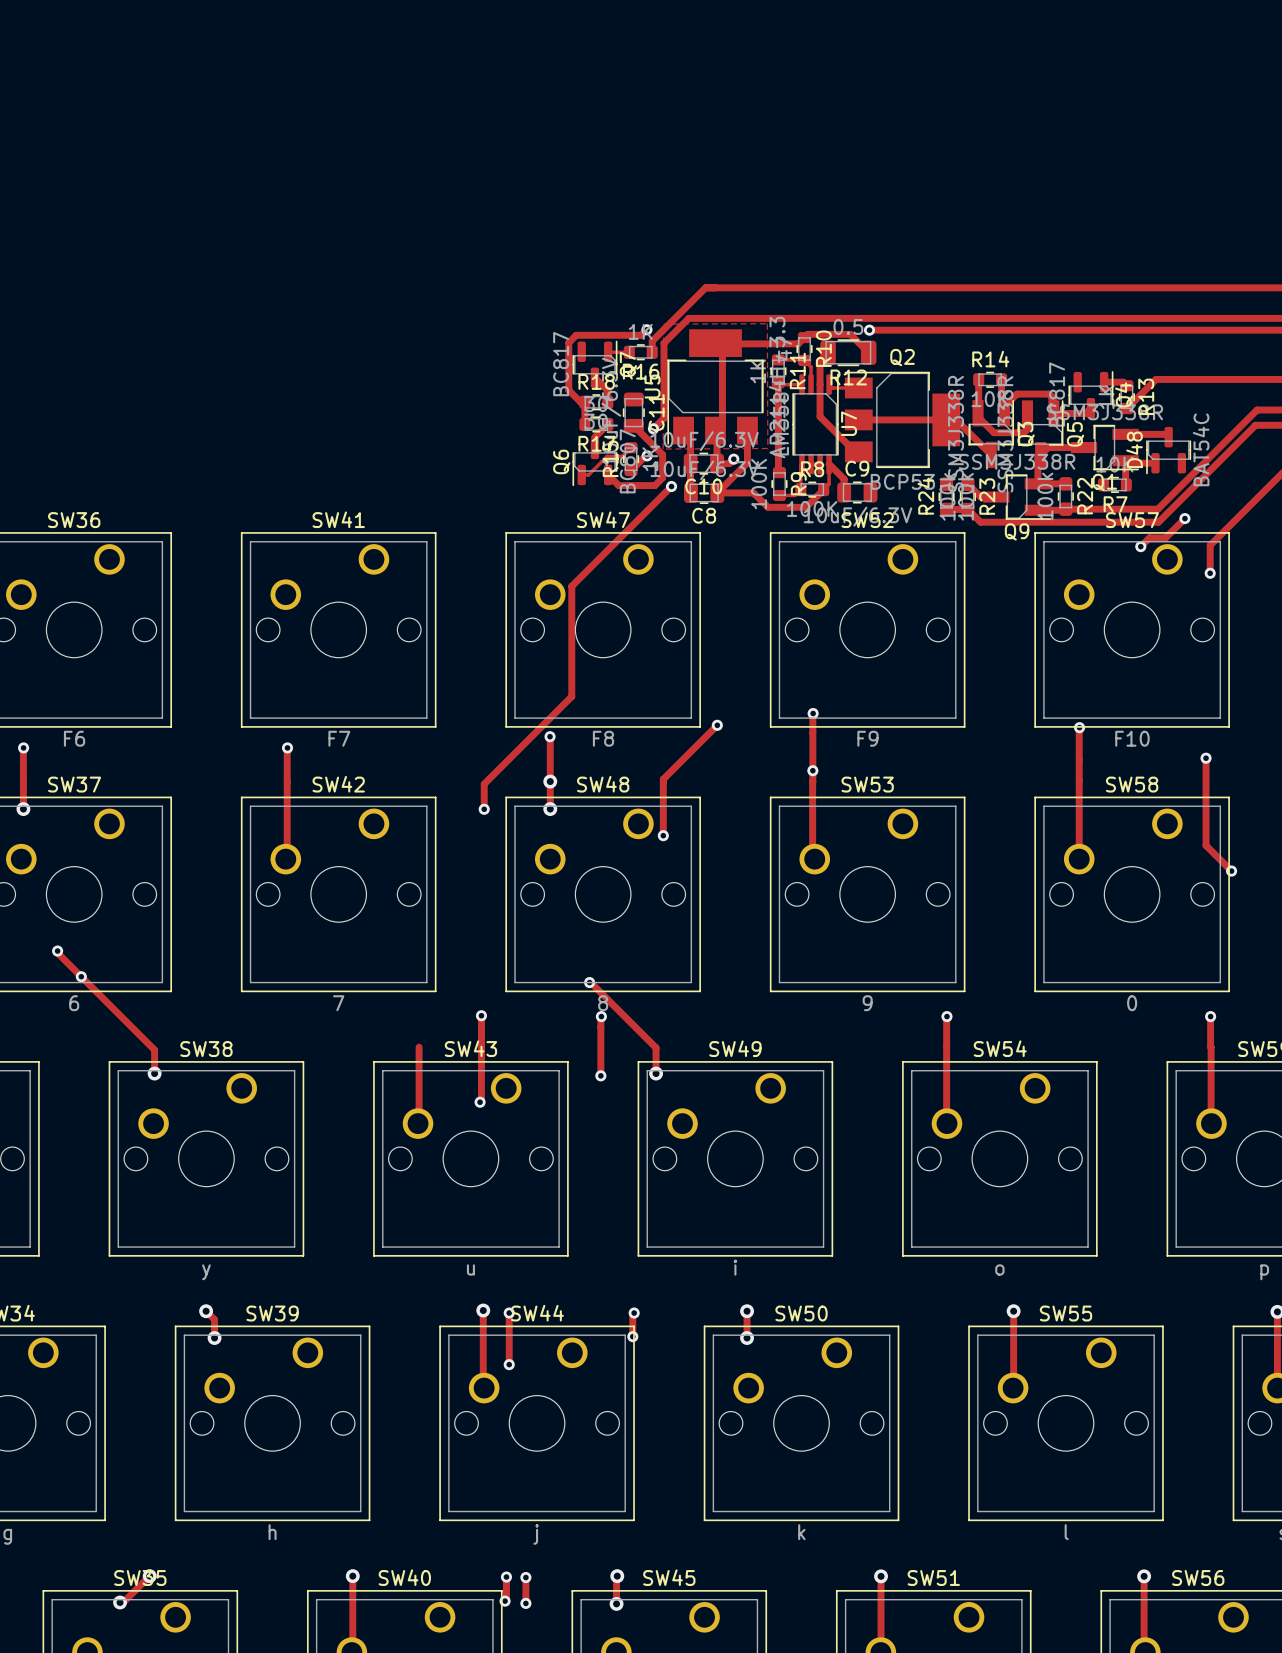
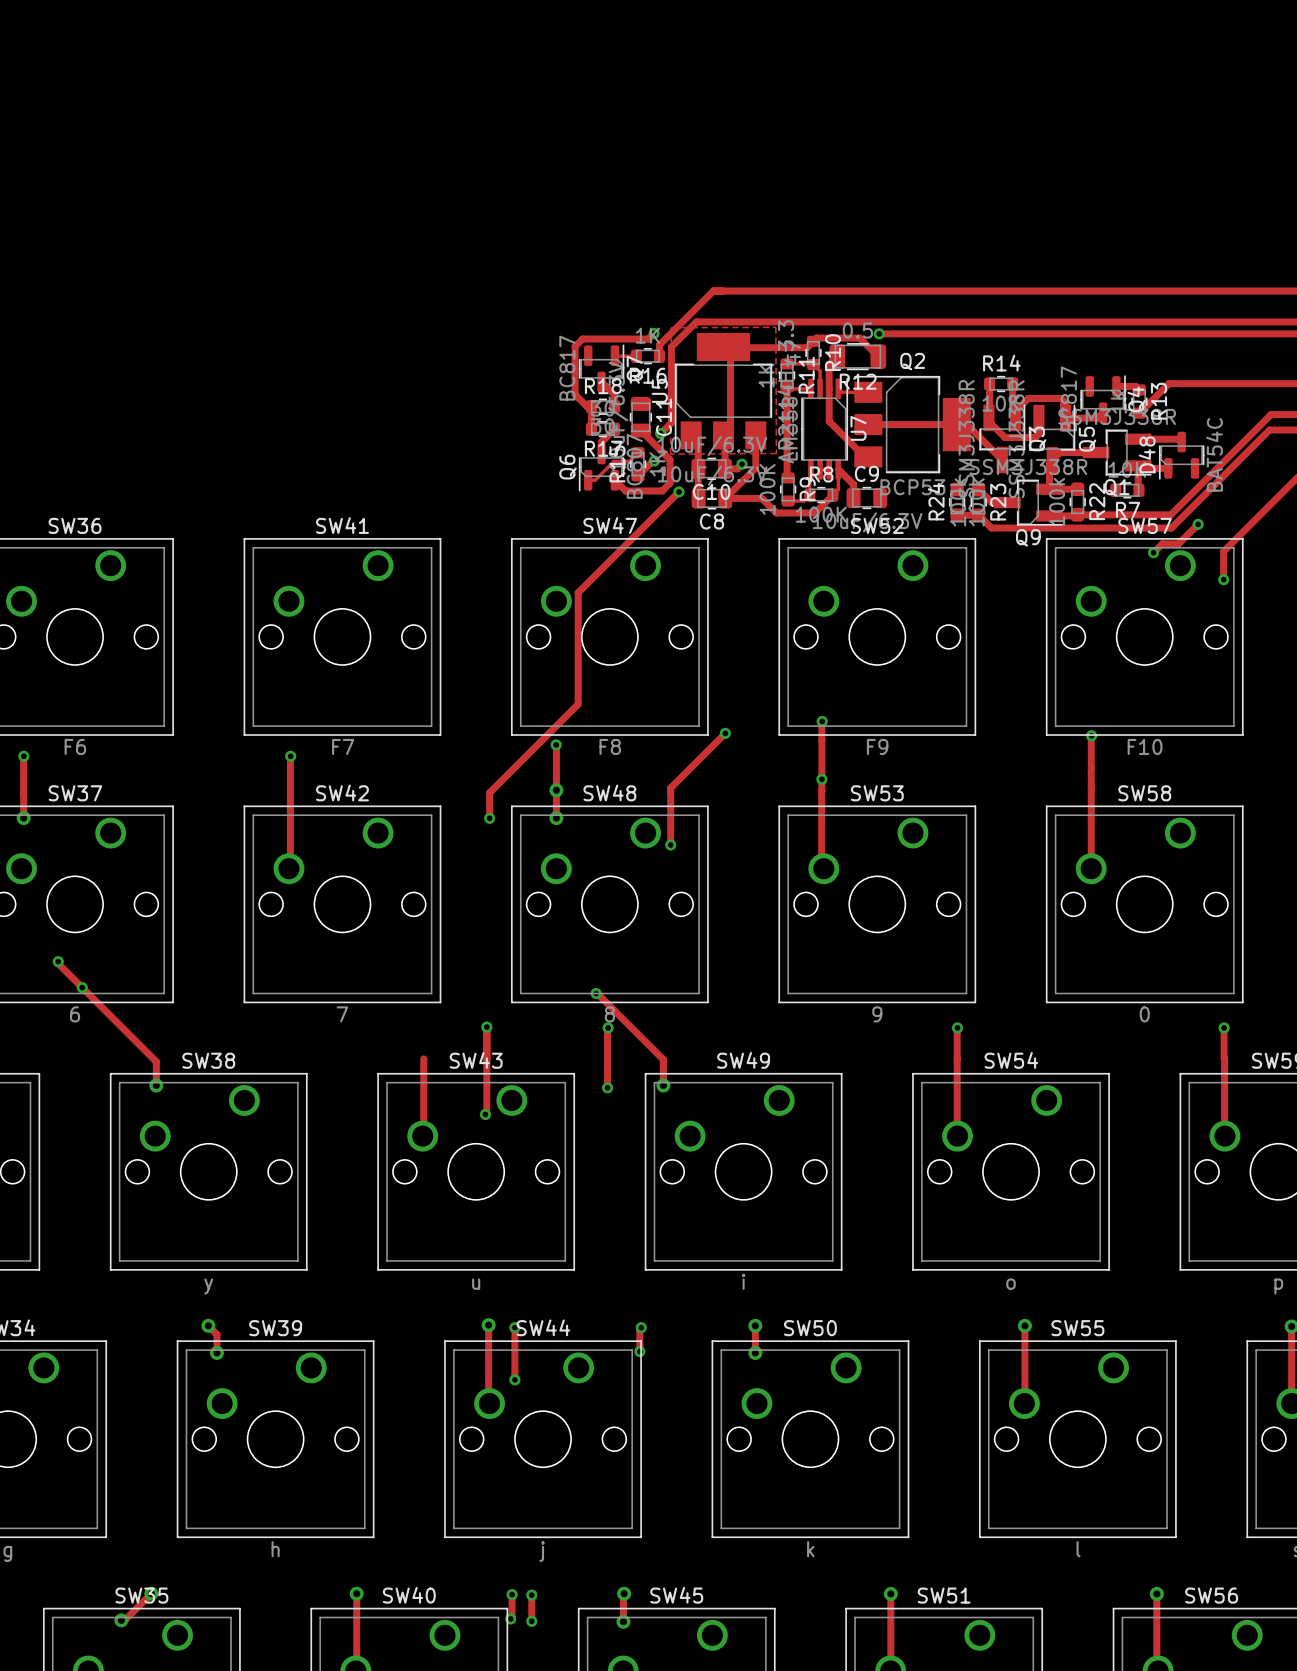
track: (1206, 758) (1206, 845) (1231, 871) -> none
via: (1206, 758) -> none
via: (1231, 871) -> none

